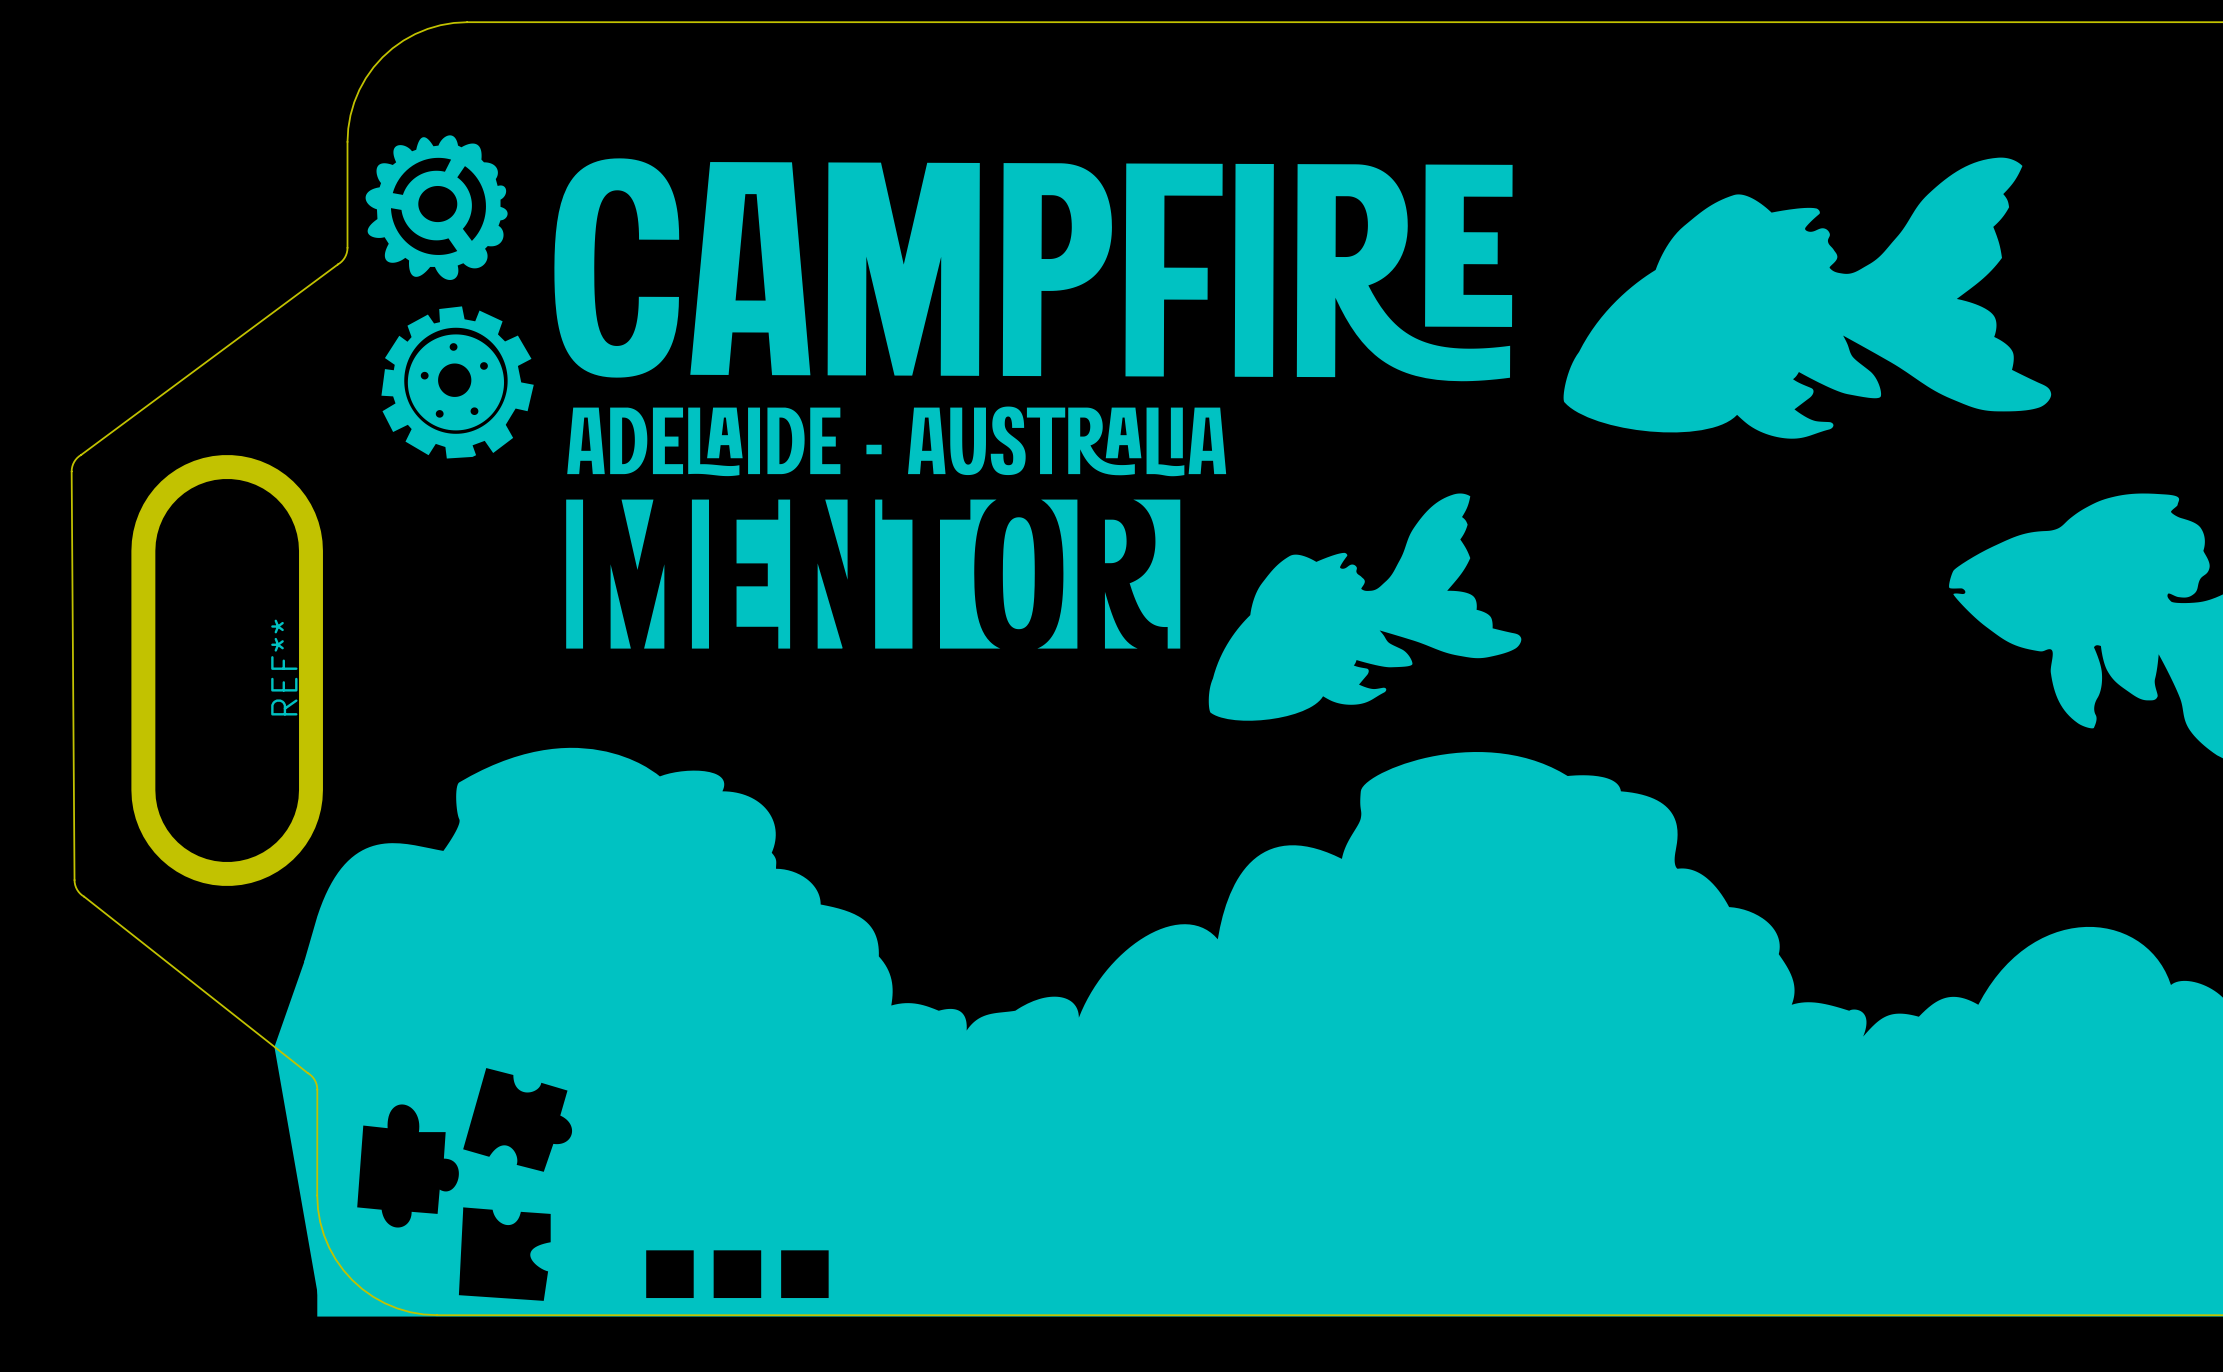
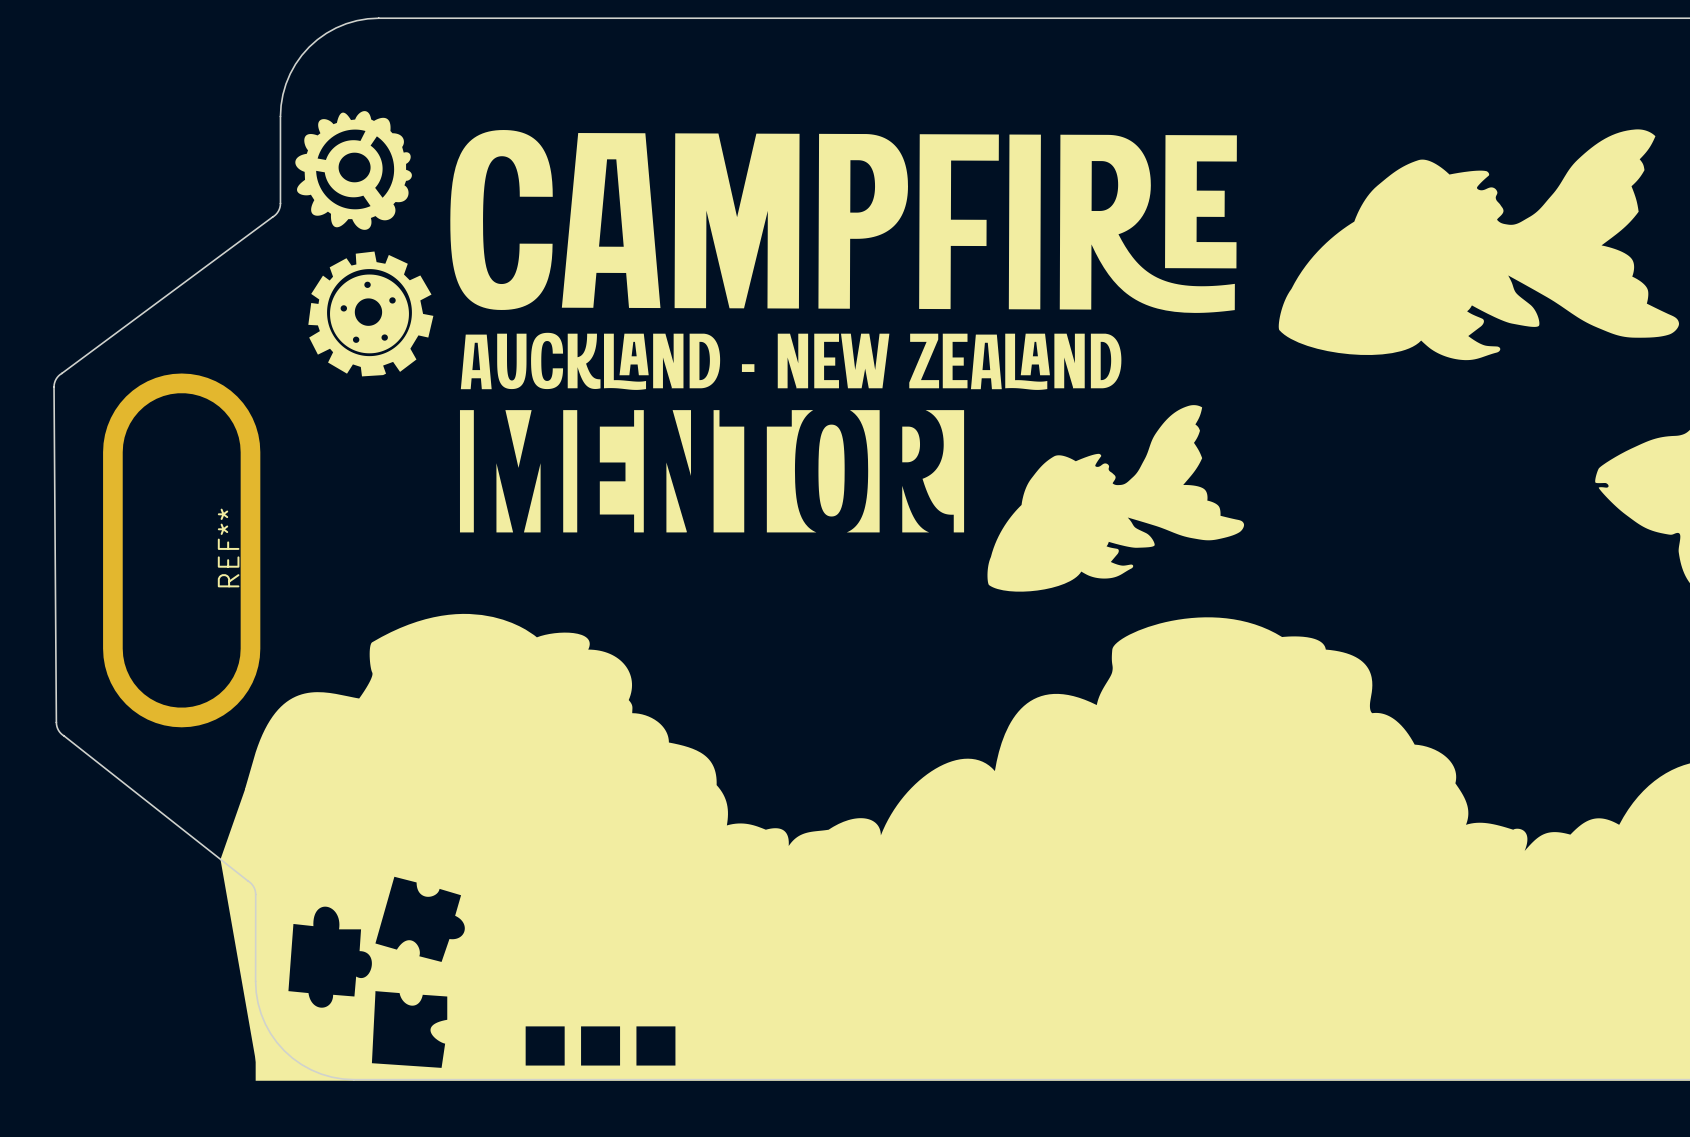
drawing: none -> [567, 333, 601, 389]
drawing: none -> [777, 333, 809, 389]
drawing shape: [990, 406, 1026, 476] -> [814, 333, 839, 389]
drawing: none -> [909, 333, 940, 389]
drawing: none -> [1005, 333, 1122, 390]
drawing: [610, 407, 648, 475] -> none
drawing shape: [652, 407, 684, 475] -> [531, 332, 564, 390]
drawing: [748, 407, 761, 475] -> none
drawing shape: [810, 407, 841, 475] -> [653, 333, 684, 389]
drawing: [907, 407, 946, 475] -> none
drawing shape: [1026, 407, 1066, 475] -> [841, 333, 890, 389]
drawing: [1068, 407, 1135, 476] -> none
drawing shape: [1146, 407, 1185, 477] -> [942, 333, 968, 389]
drawing: [1170, 407, 1183, 459] -> none
drawing position: (724, 432) -> (634, 354)
drawing position: (1123, 432) -> (1035, 354)
drawing position: (786, 440) -> (704, 360)
drawing position: (713, 441) -> (625, 361)
drawing position: (968, 441) -> (511, 361)
drawing position: (874, 449) -> (748, 368)

